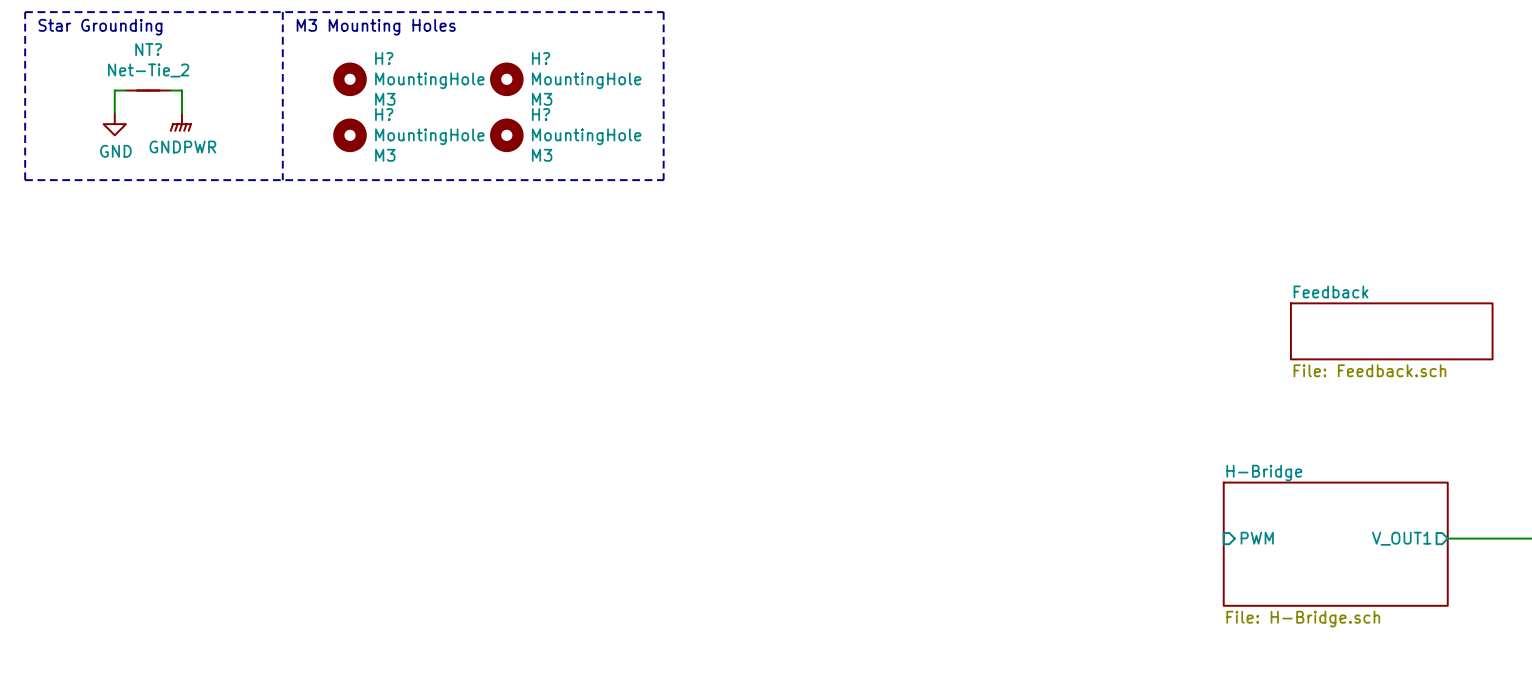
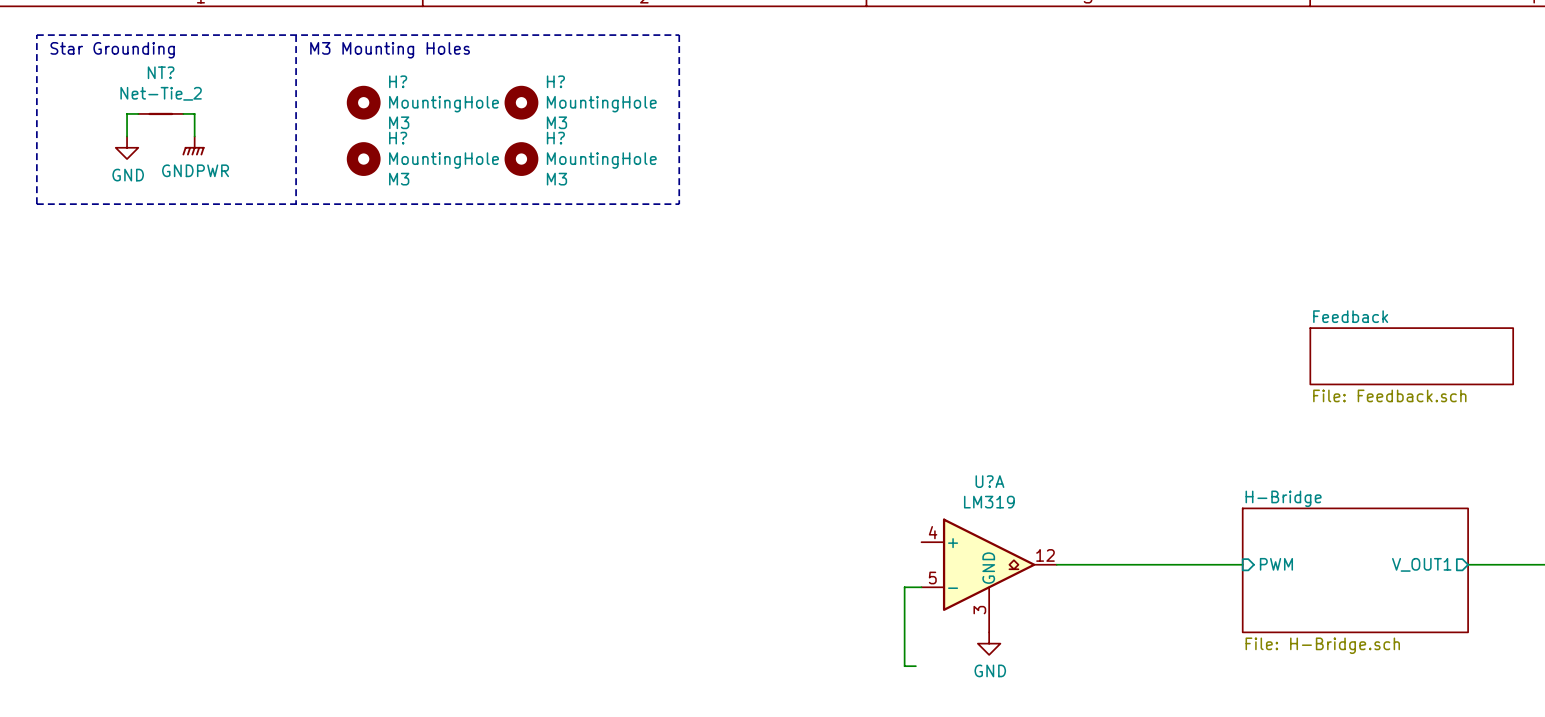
wire: none -> (1056, 564) (1242, 564)
U?A: none -> LM319 (989, 575)
wire: none -> (921, 587) (904, 587) (904, 666) (915, 666)
power symbol: none -> GND (989, 643)

